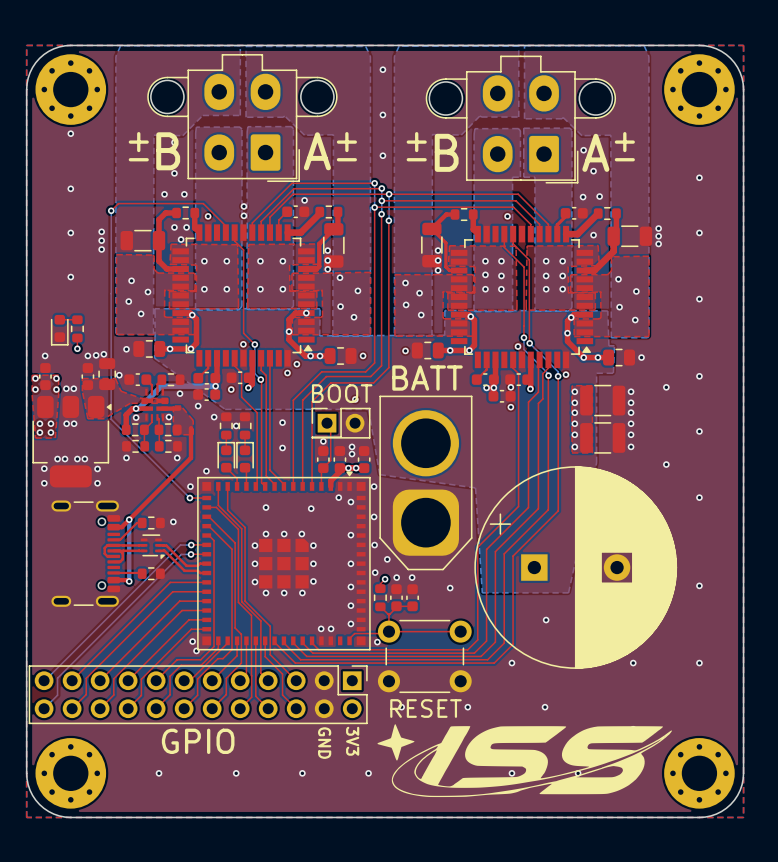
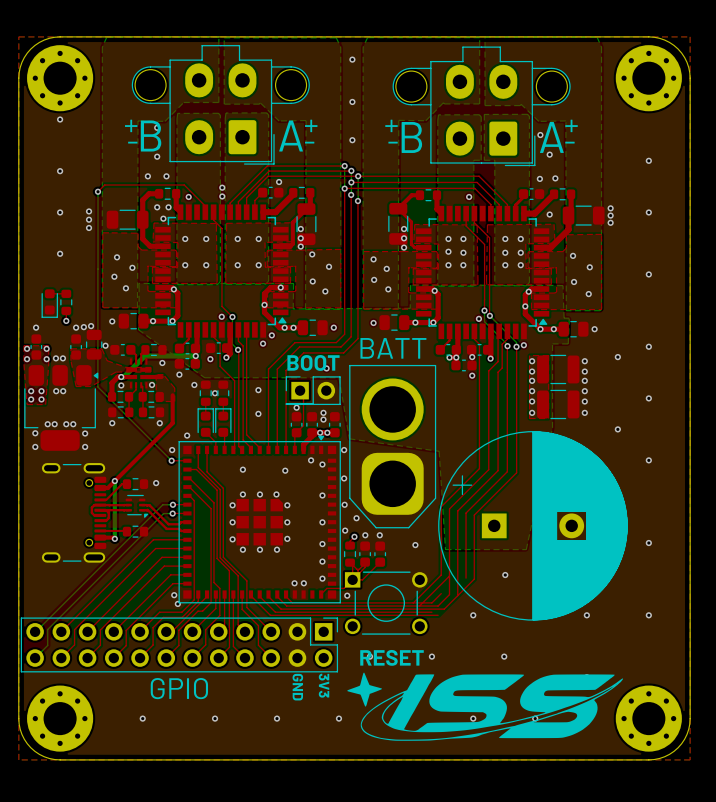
top track: (397, 606) (412, 606) -> (350, 562) (352, 565) (352, 579) (362, 579) (380, 562)
part footprint: [377, 619, 472, 693] -> [344, 571, 428, 635]
top track: (477, 620) (477, 639) -> (441, 575) (413, 602)
top track: none -> (449, 576) (419, 606)
top track: (504, 623) (504, 643) (487, 659) (467, 659) -> none
top track: (513, 624) (513, 644) (494, 663) (474, 663) -> (474, 579) (457, 595)
top track: (460, 631) (354, 633) (349, 640) -> (365, 563) (365, 567) (344, 588) (326, 588) (321, 594)

